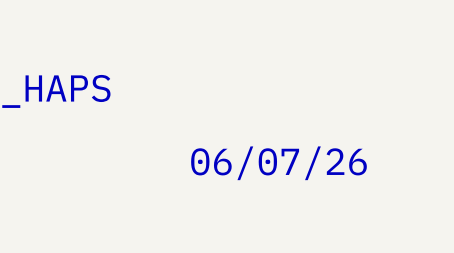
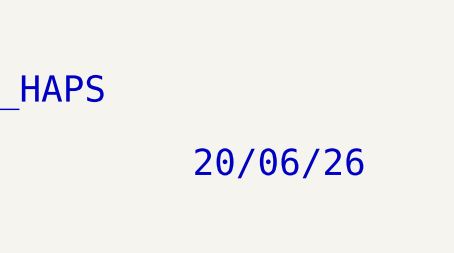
text: 06/07/26 (278, 163) -> 20/06/26 (279, 163)

